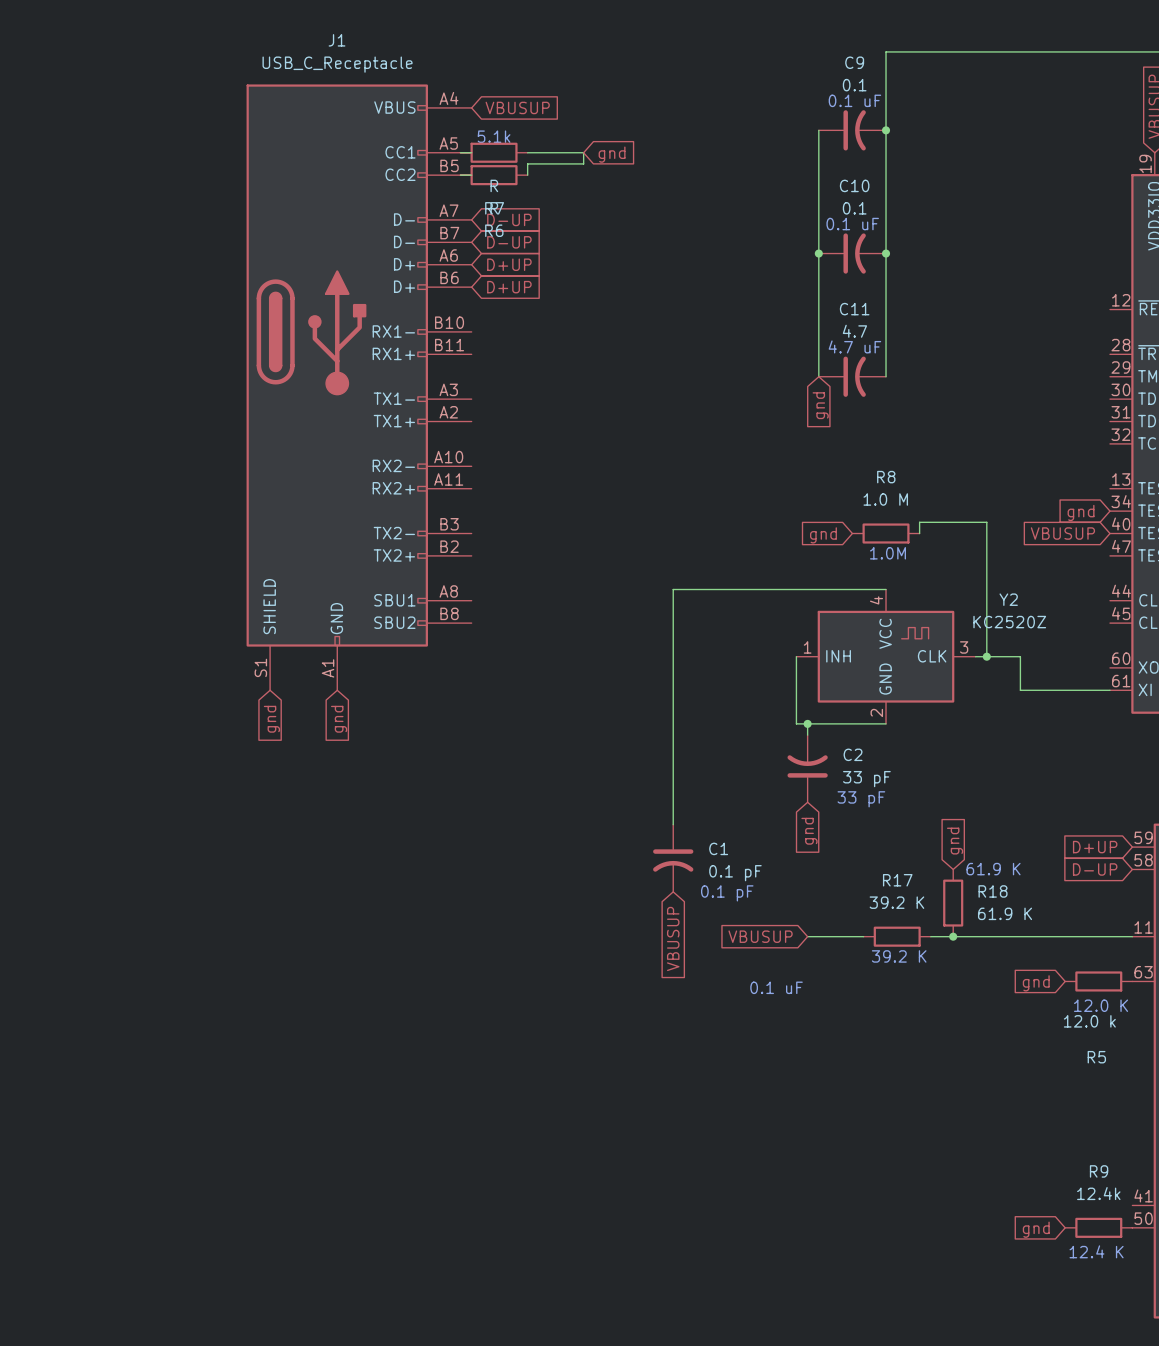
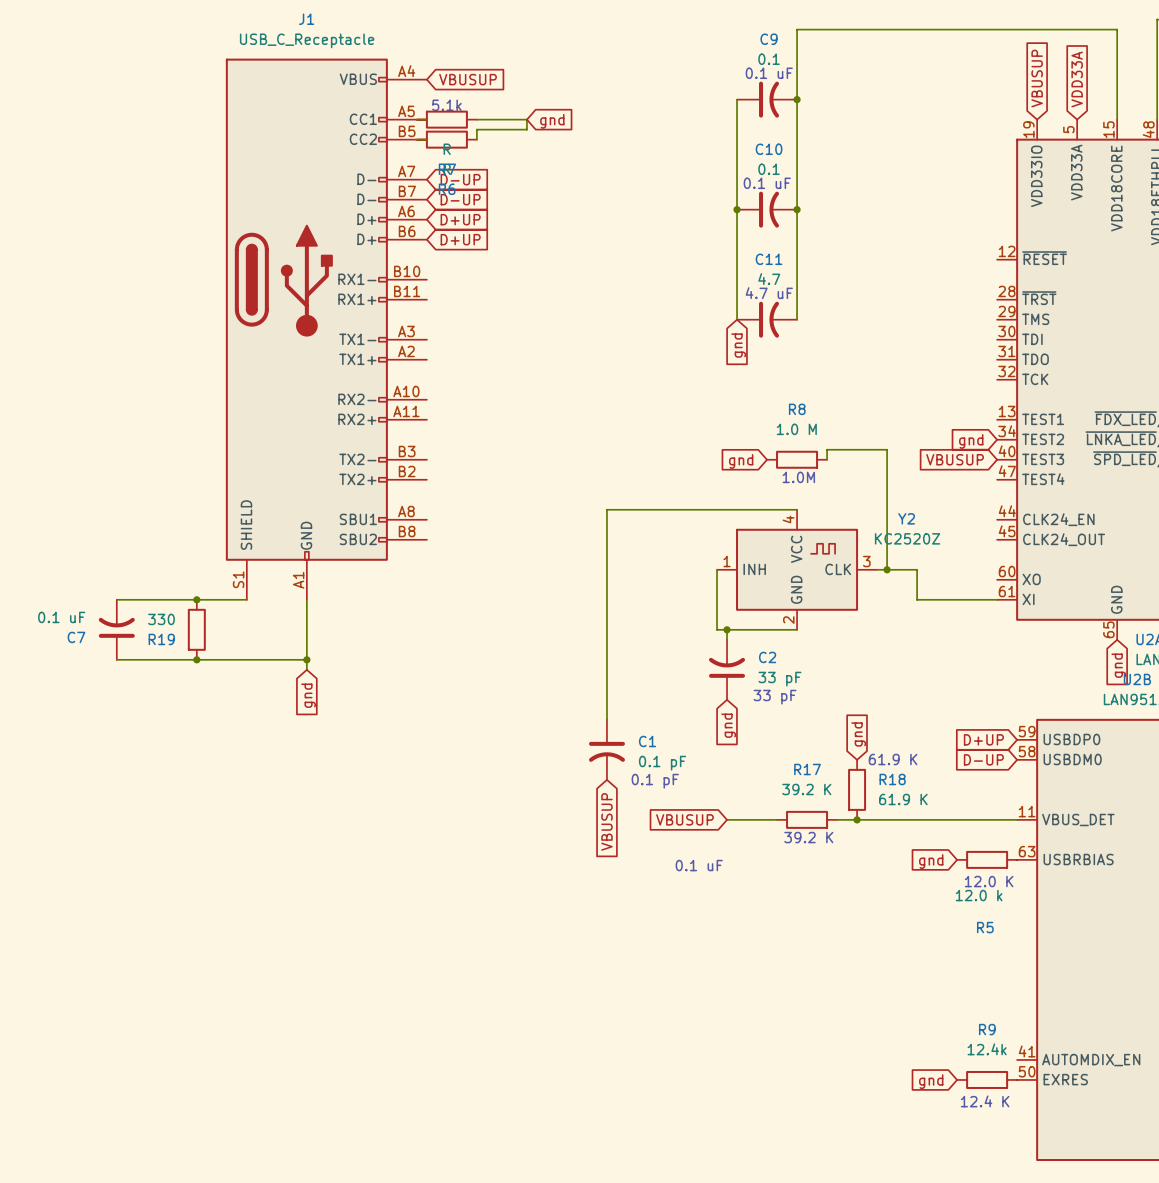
wire: none -> (116, 599) (246, 599)
junction: none -> (196, 599)
wire: none -> (306, 599) (306, 669)
global label: gnd (271, 719) -> none
global label: gnd (339, 719) -> none
C7: none -> 0.1 uF (116, 629)
R19: none -> 330 (196, 629)
wire: none -> (116, 659) (306, 659)
junction: none -> (196, 659)
junction: none -> (306, 659)
global label: none -> gnd (308, 695)

